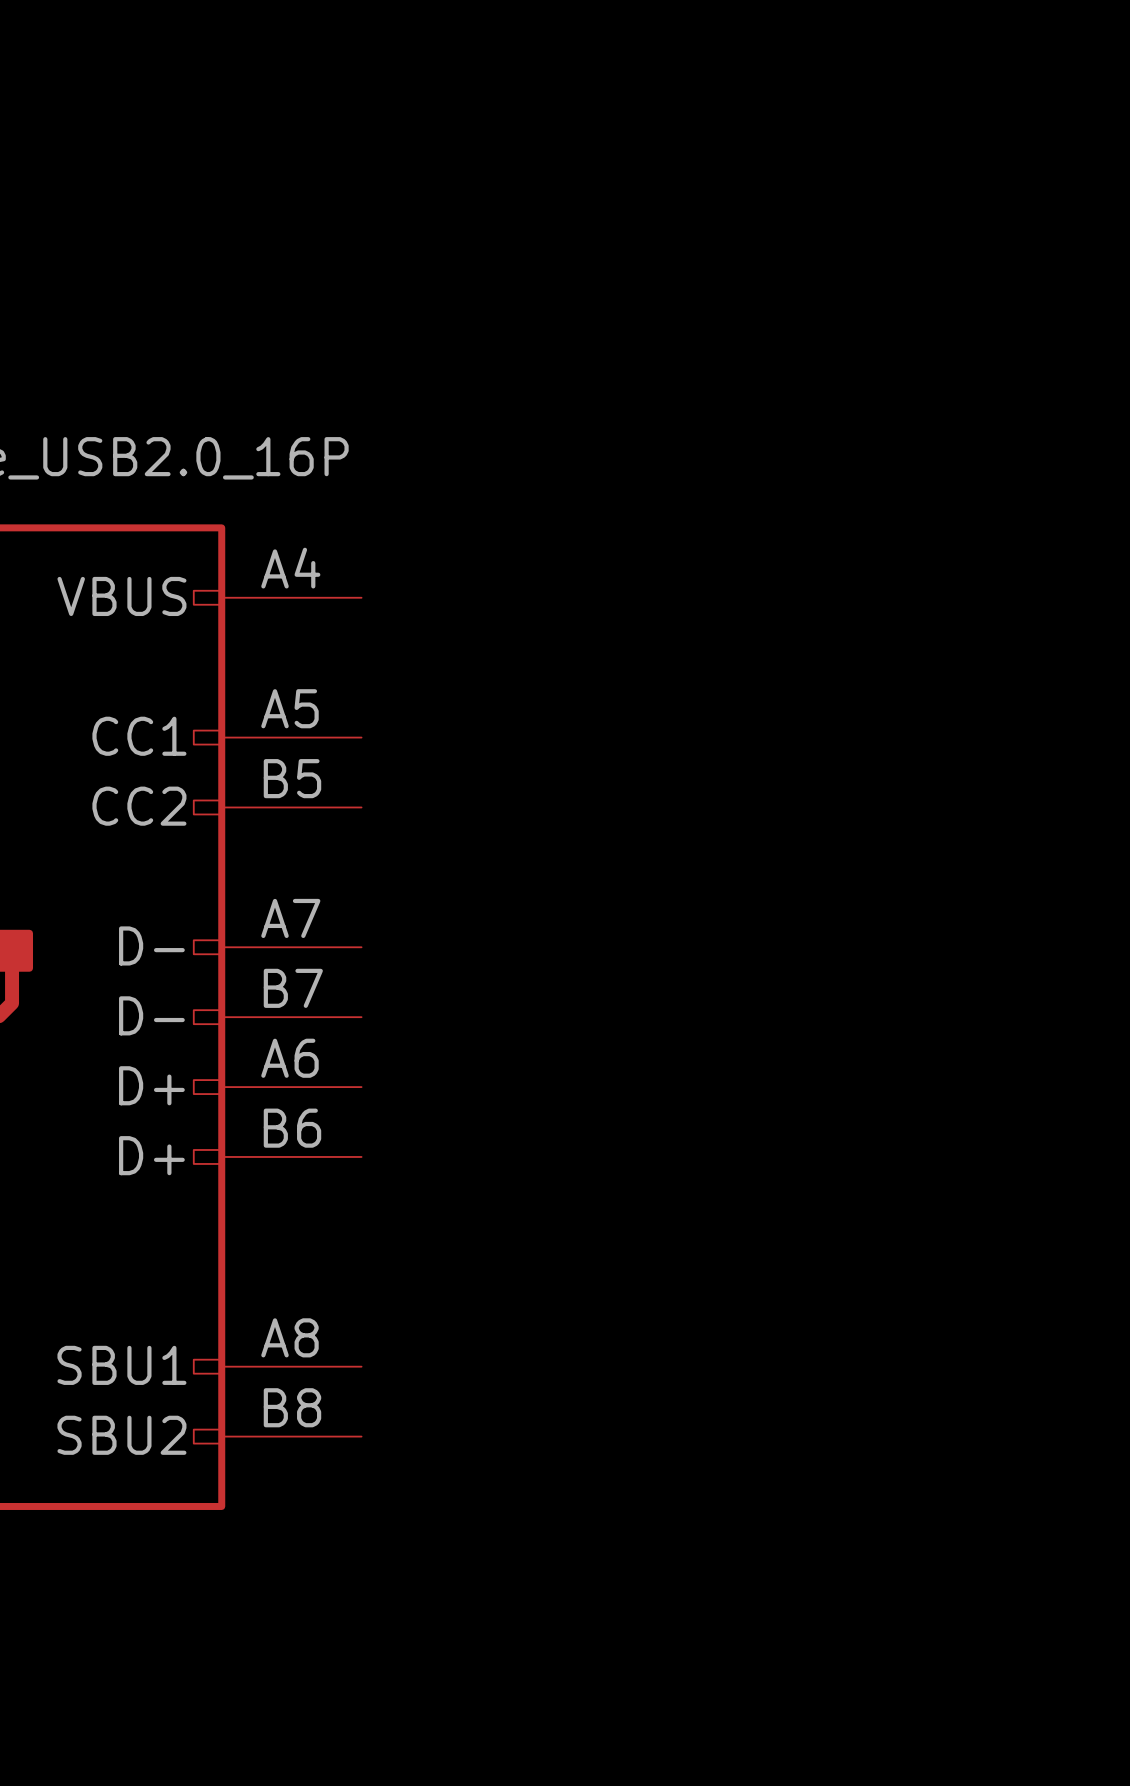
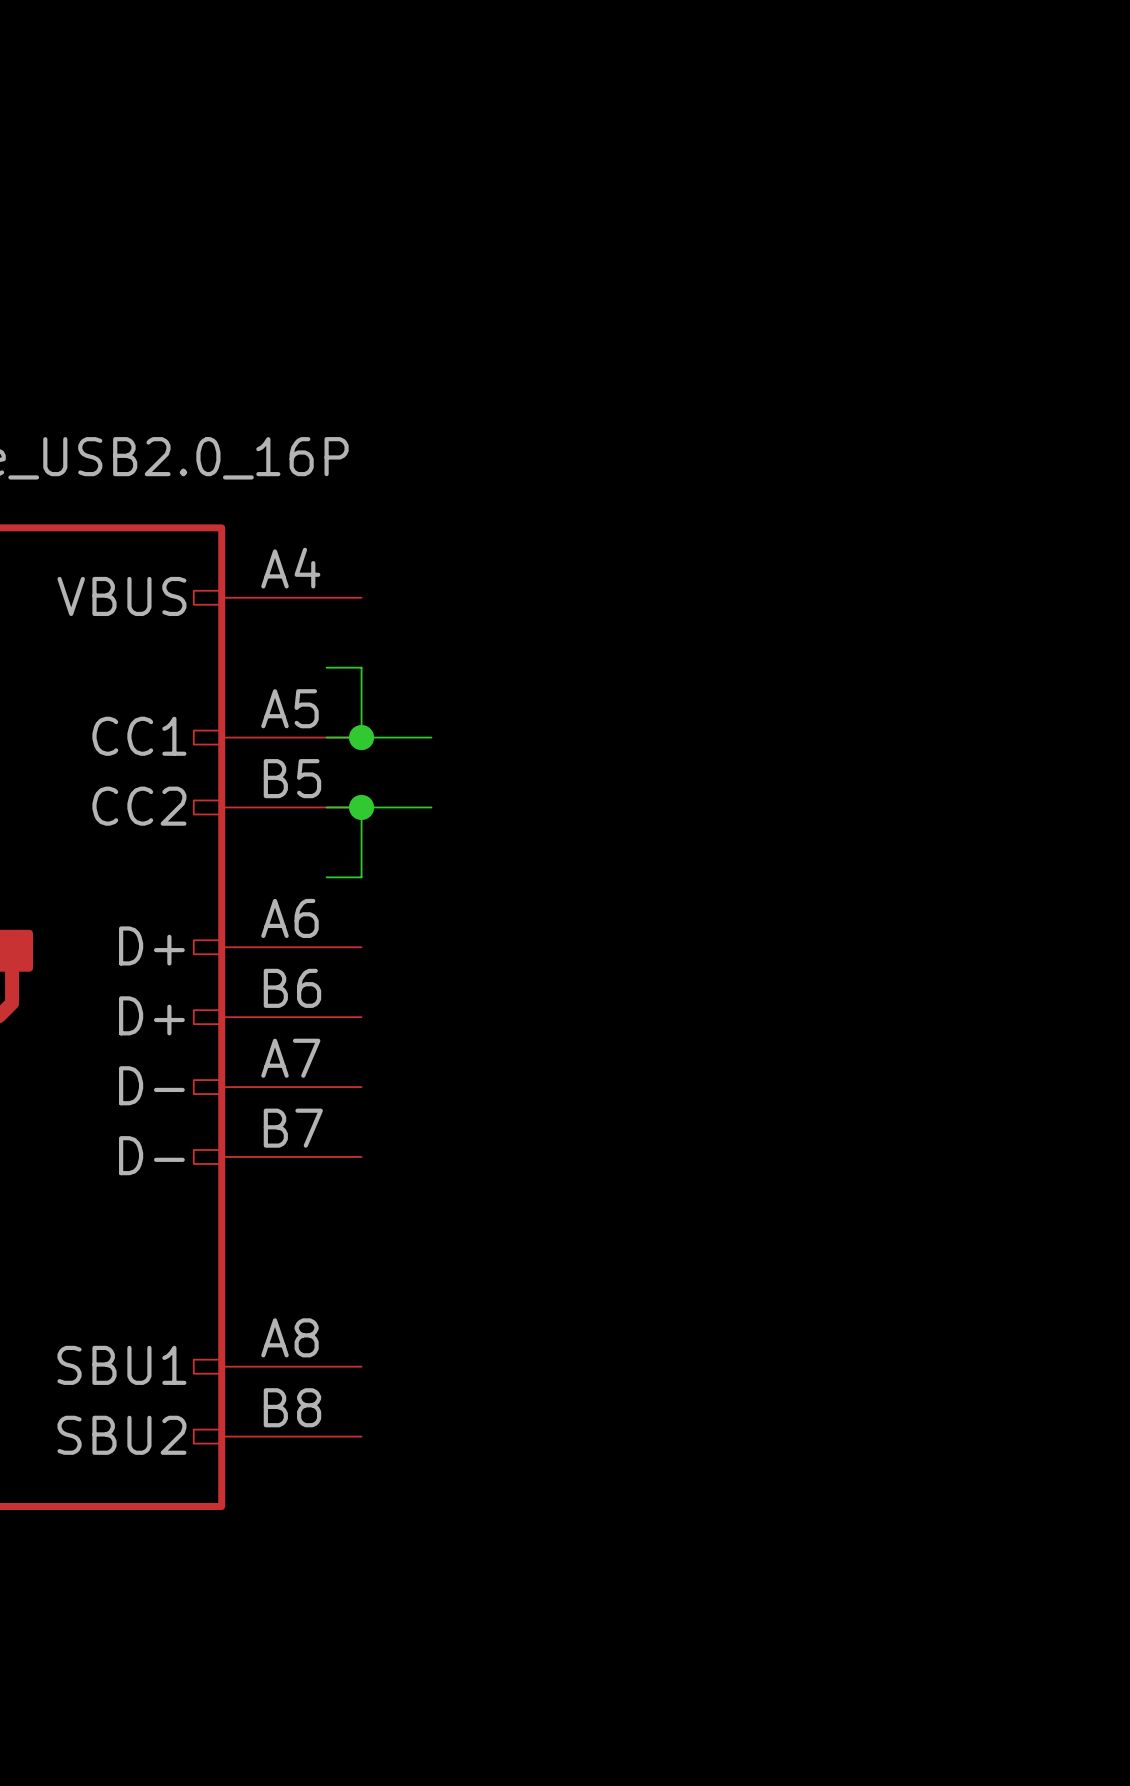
wire: none -> (326, 667) (361, 667) (361, 737)
wire: none -> (326, 737) (431, 737)
junction: none -> (361, 737)
wire: none -> (326, 807) (431, 807)
wire: none -> (361, 807) (361, 877) (326, 877)
junction: none -> (361, 807)
part pin number: A7 (290, 918) -> A6 (289, 918)
part pin name: D- (151, 945) -> D+ (151, 945)
part pin number: B7 (293, 988) -> B6 (292, 988)
part pin name: D- (151, 1015) -> D+ (151, 1015)
part pin number: A6 (289, 1058) -> A7 (290, 1058)
part pin name: D+ (151, 1085) -> D- (151, 1085)
part pin number: B6 (292, 1128) -> B7 (293, 1128)
part pin name: D+ (151, 1155) -> D- (151, 1155)

